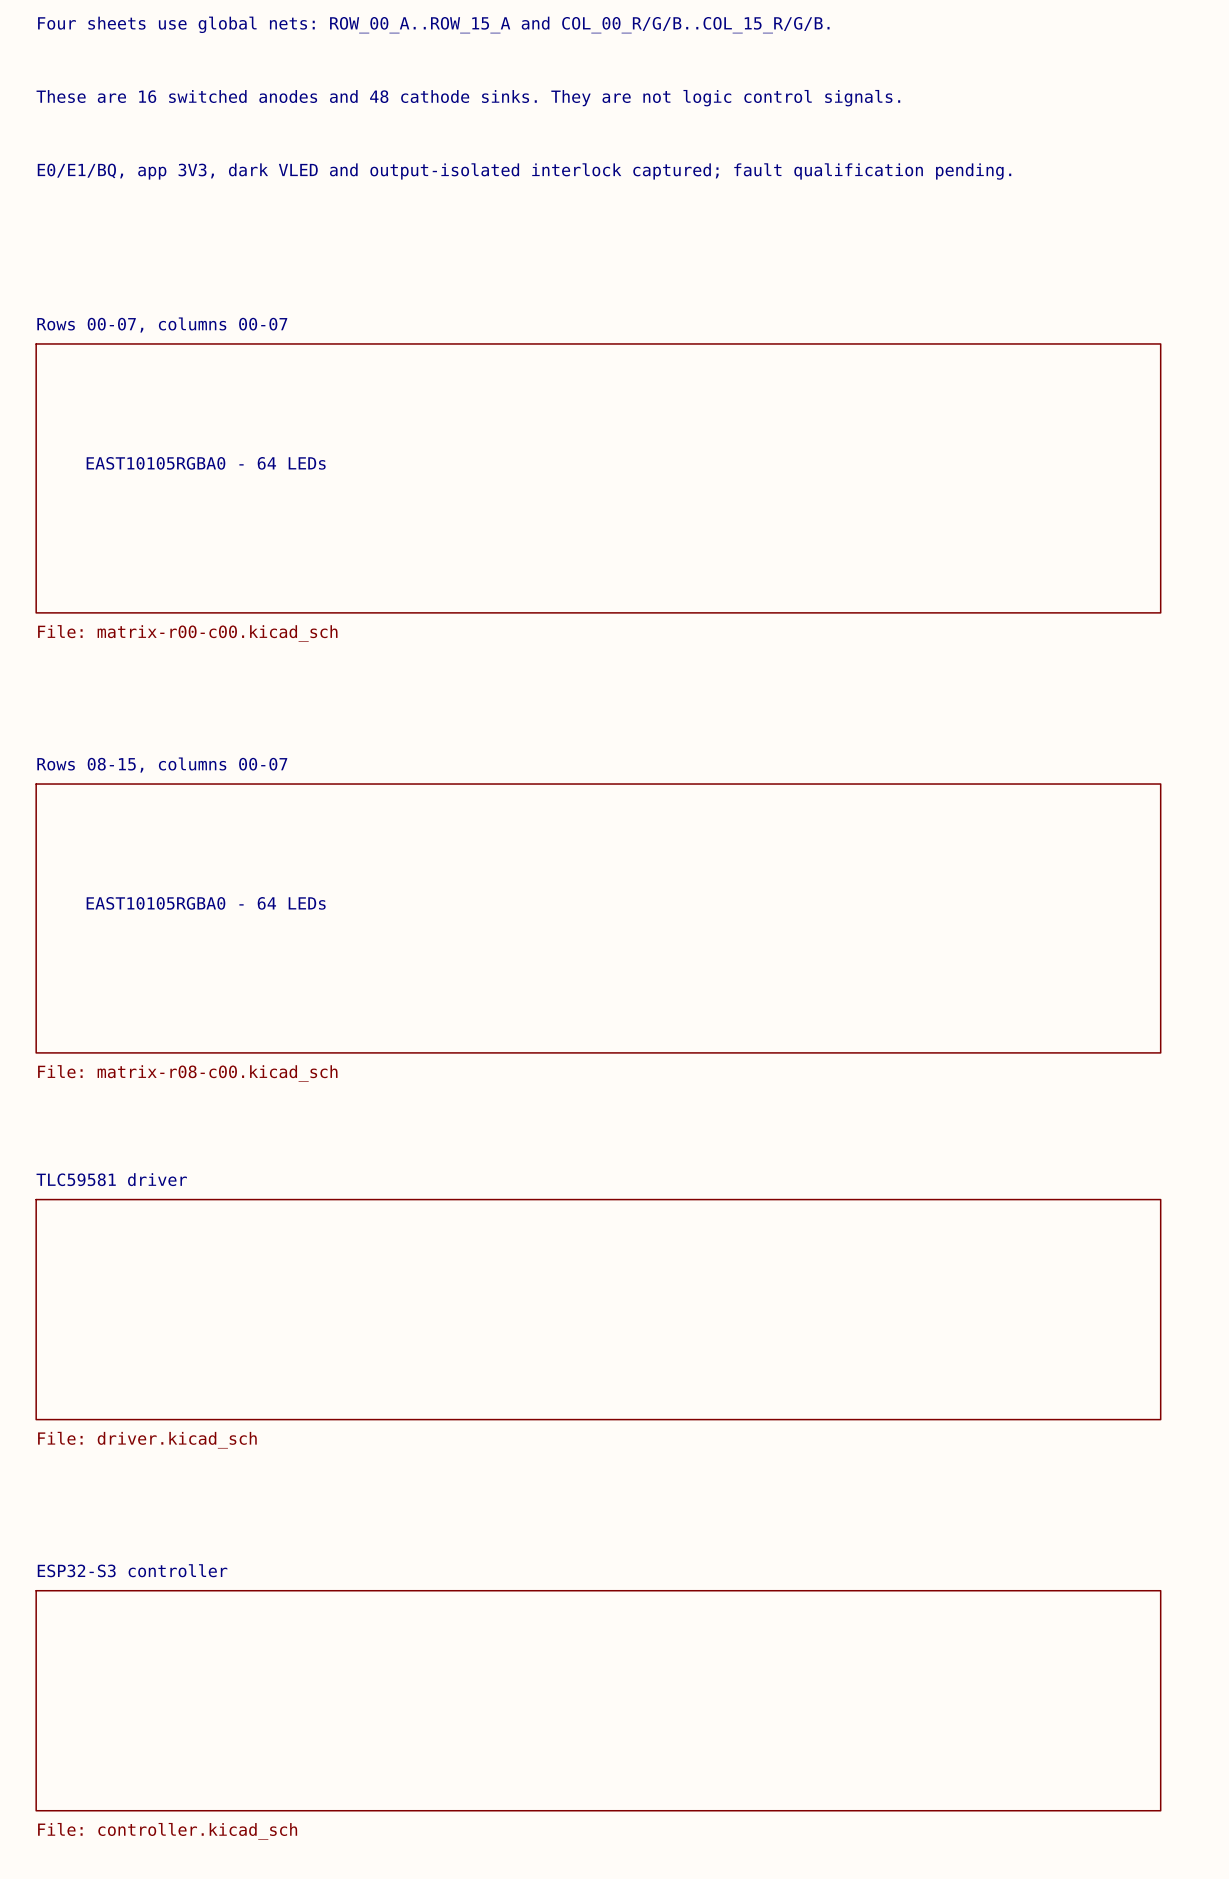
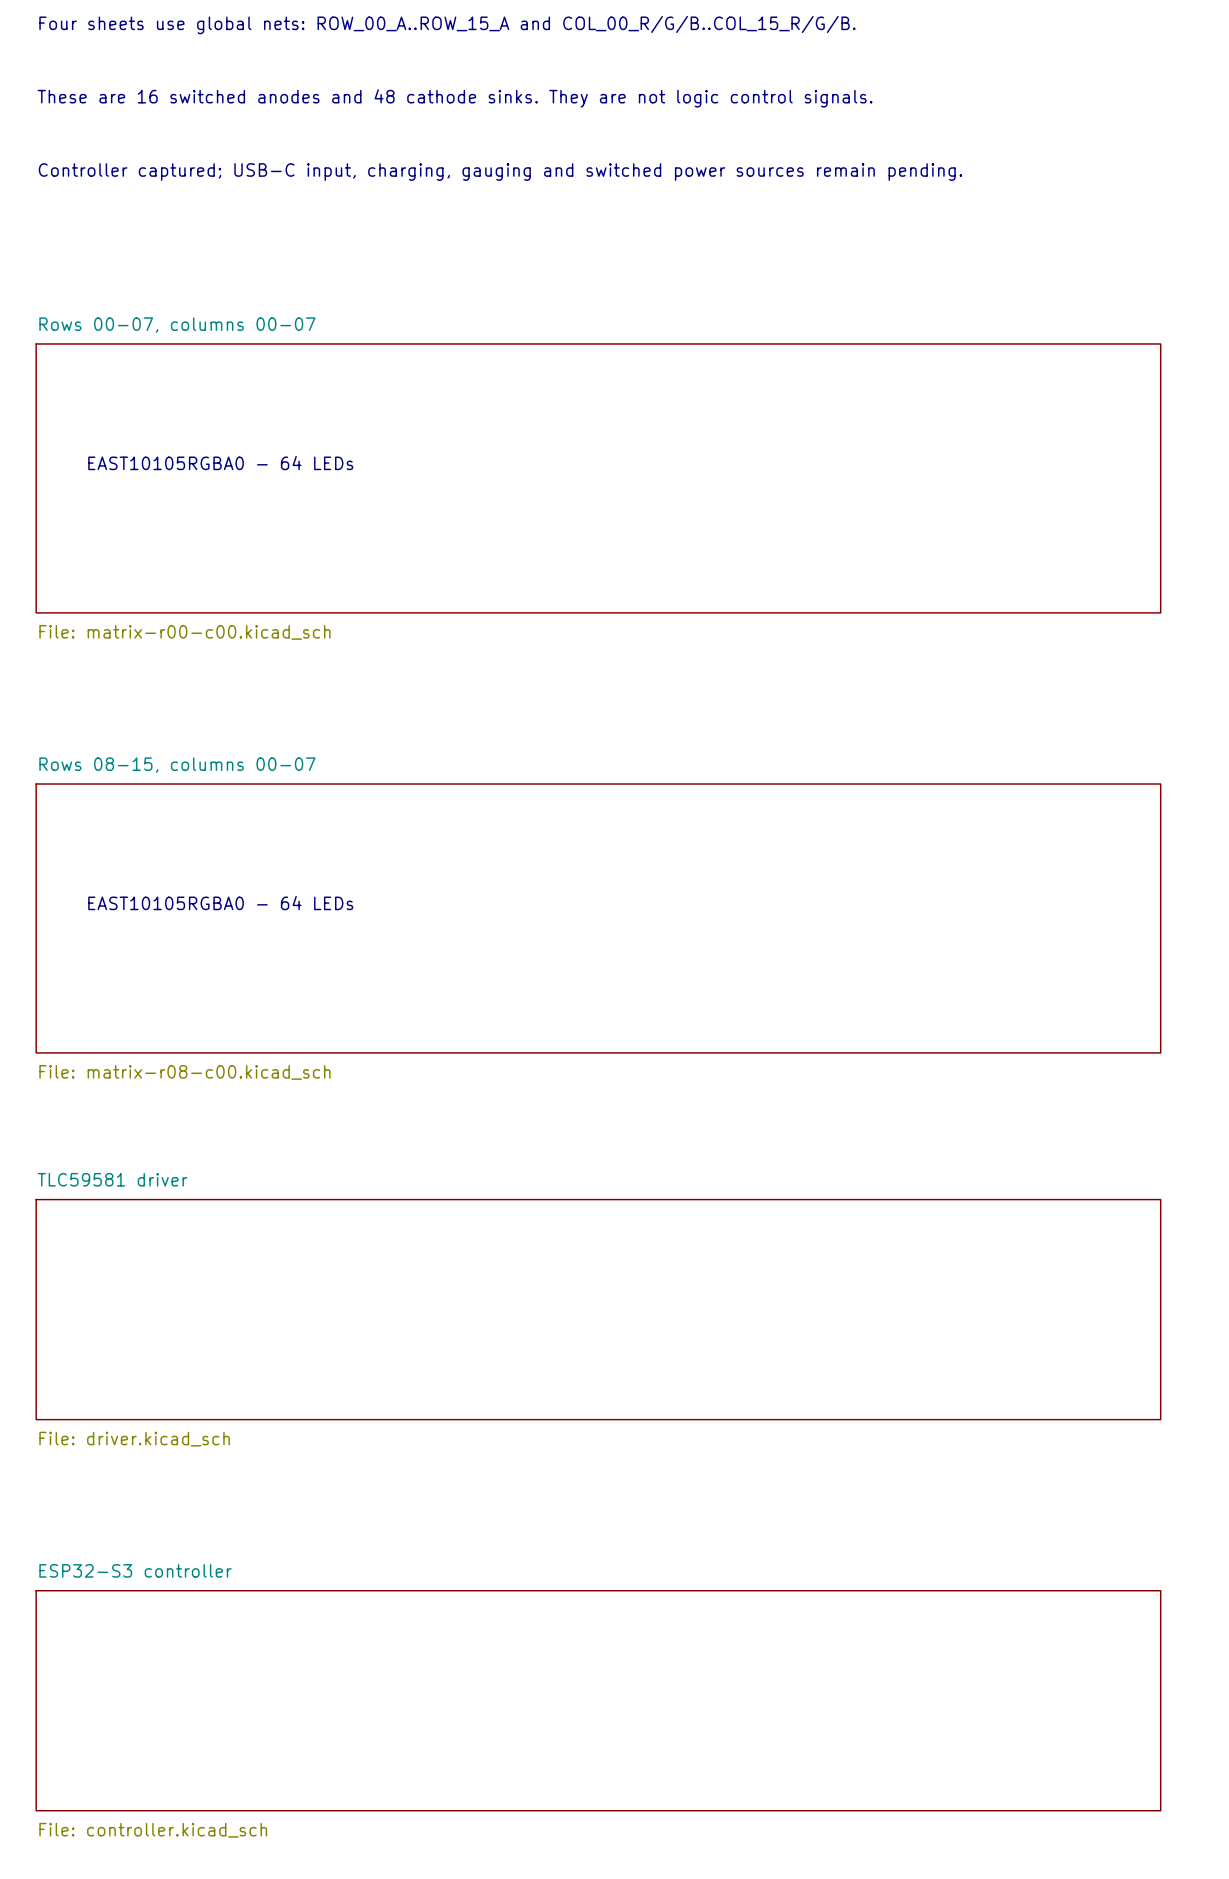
text: E0/E1/BQ, app 3V3, dark VLED and output-isolated interlock captured; fault qualification pending. (524, 171) -> Controller captured; USB-C input, charging, gauging and switched power sources remain pending. (500, 172)

